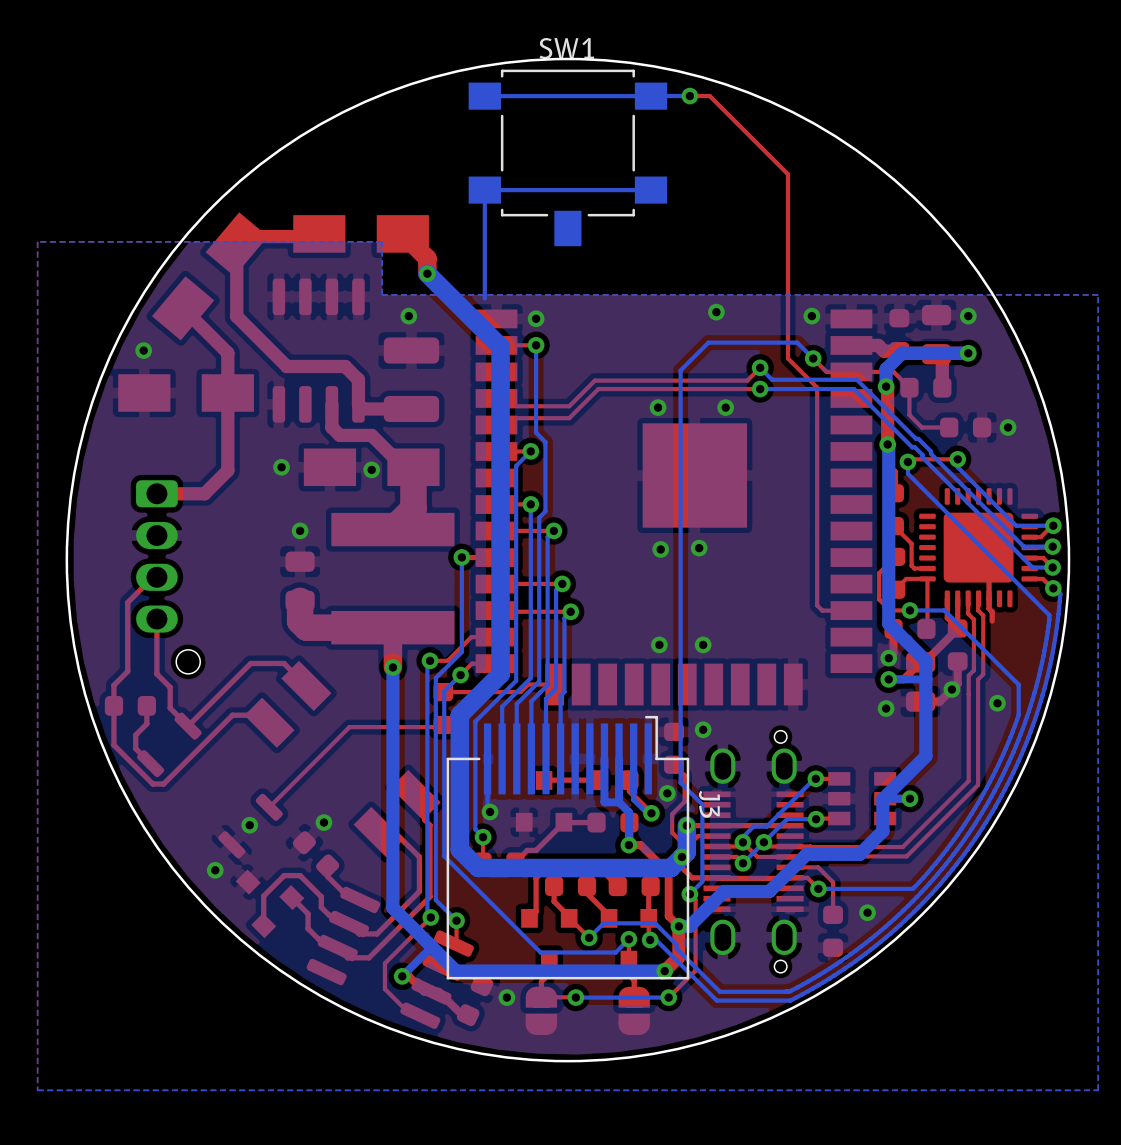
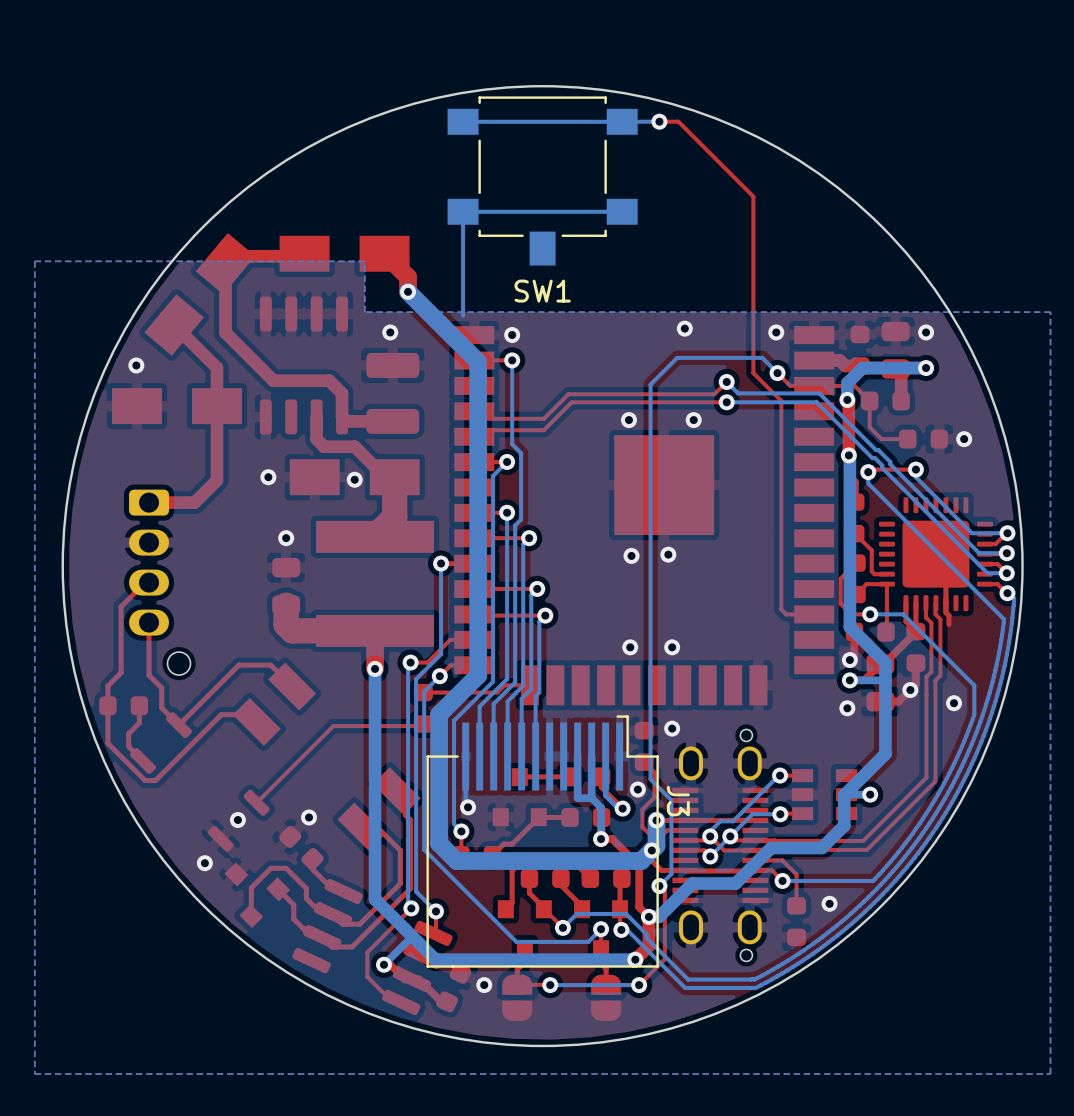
SW1 name position: SW1 (566, 48) -> SW1 (542, 291)

